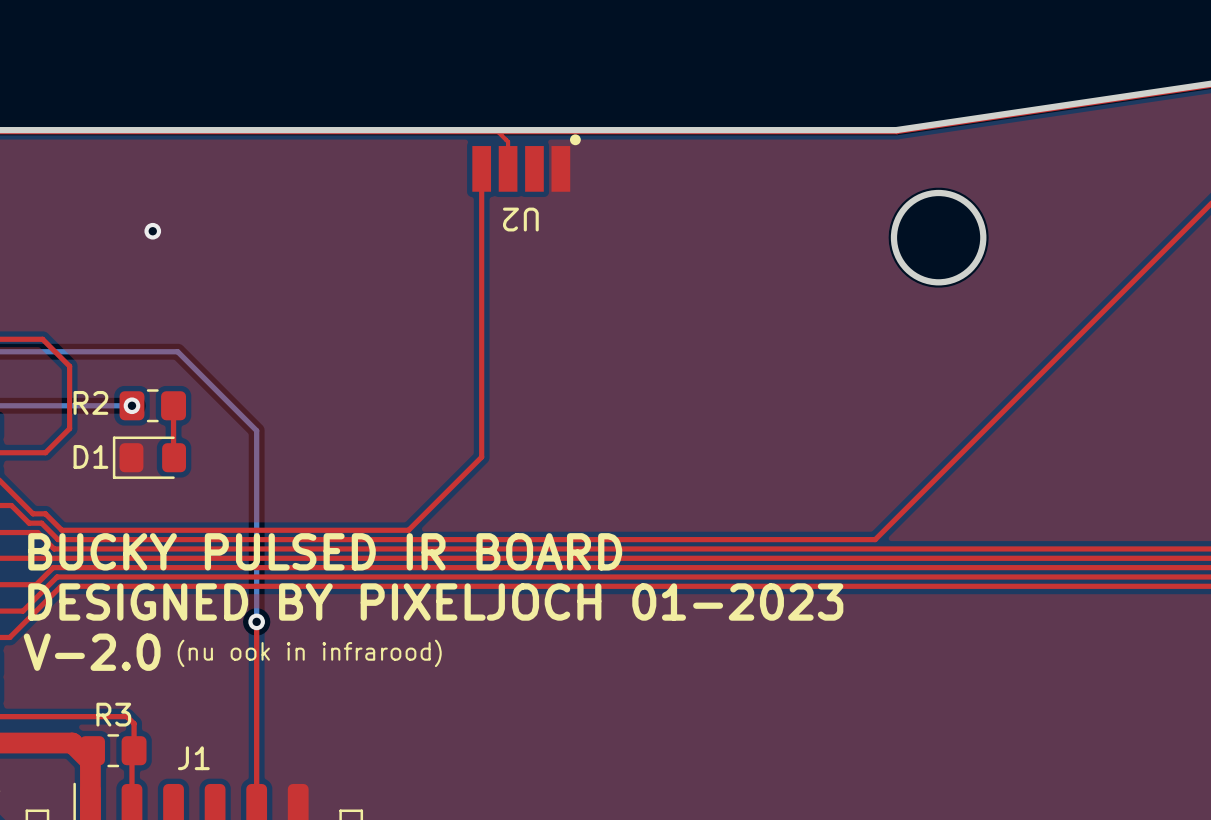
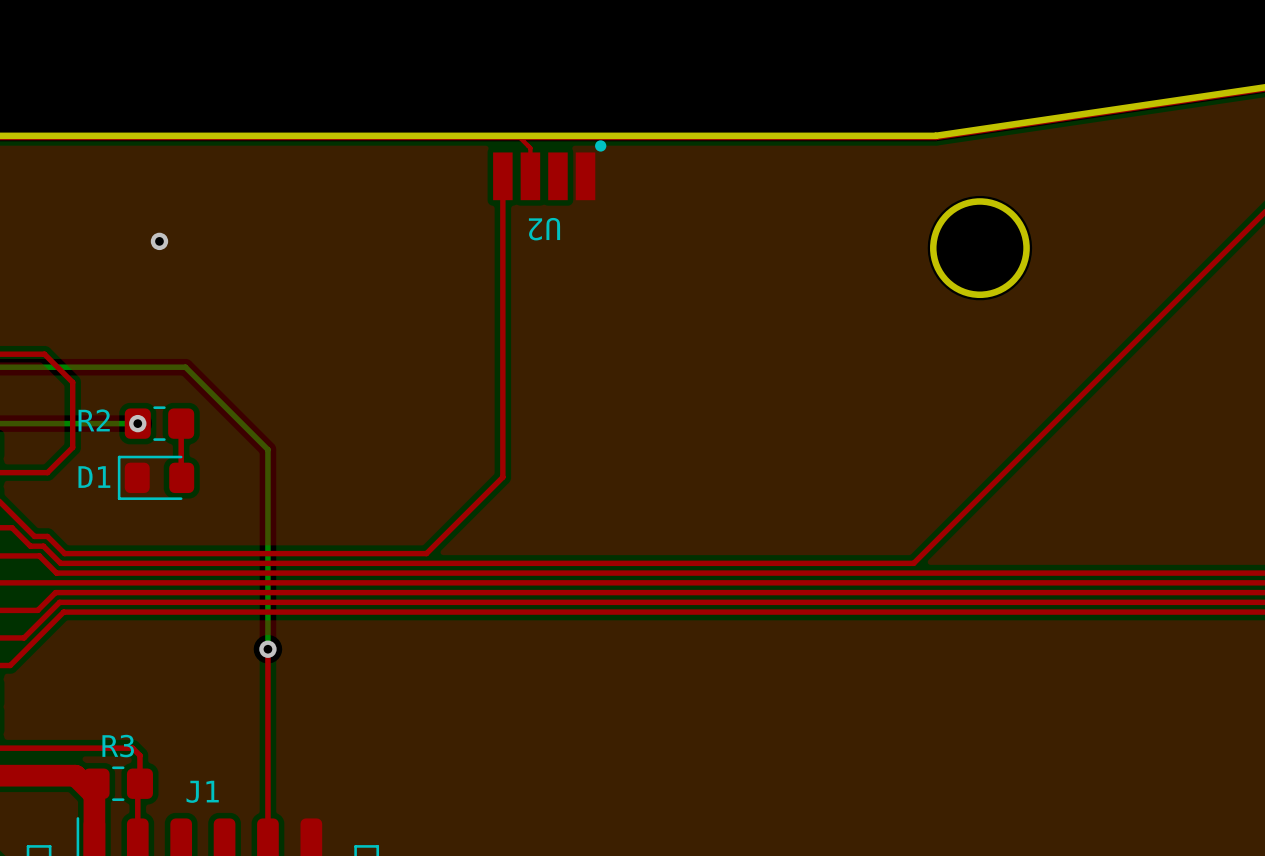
text: BUCKY PULSED IR BOARD (325, 551) -> none
text: DESIGNED BY PIXELJOCH 01-2023 (435, 602) -> none
text: V-2.0 (92, 652) -> none
text: (nu ook in infrarood) (309, 653) -> none

